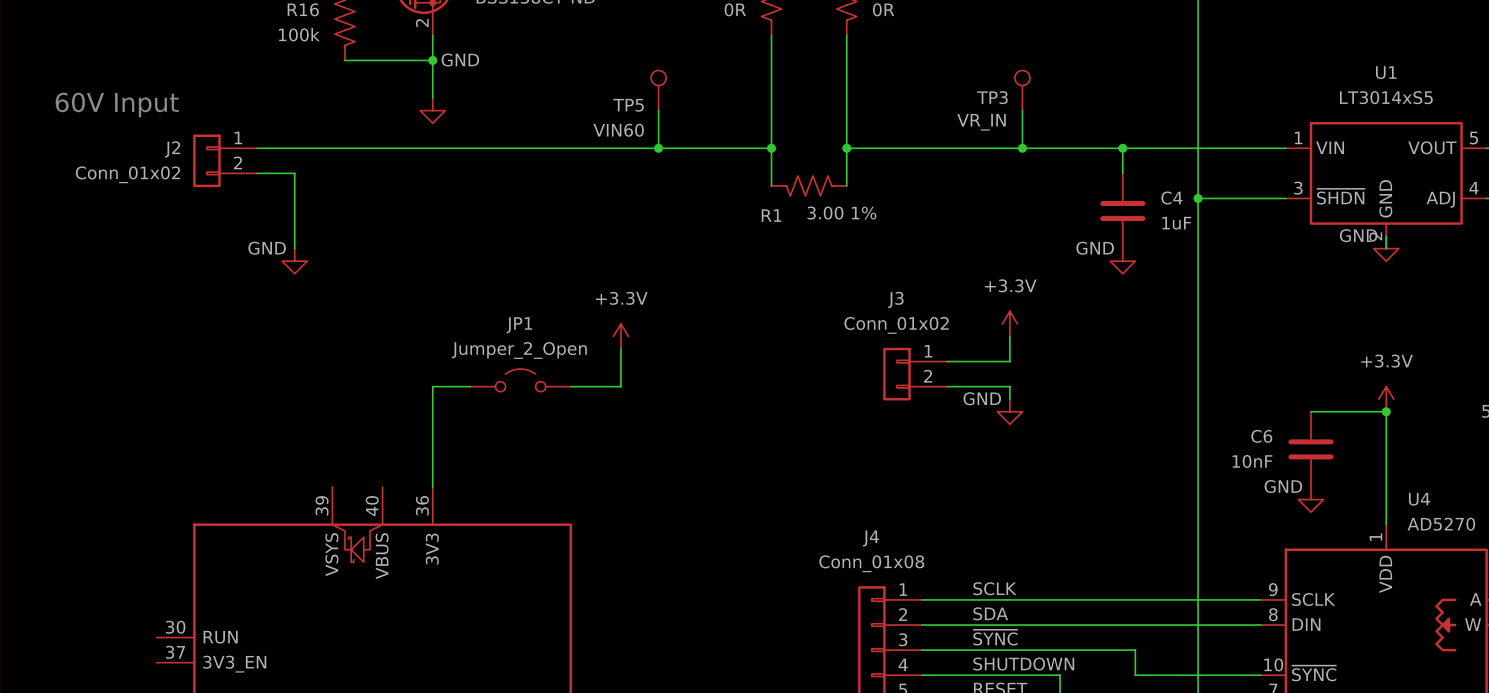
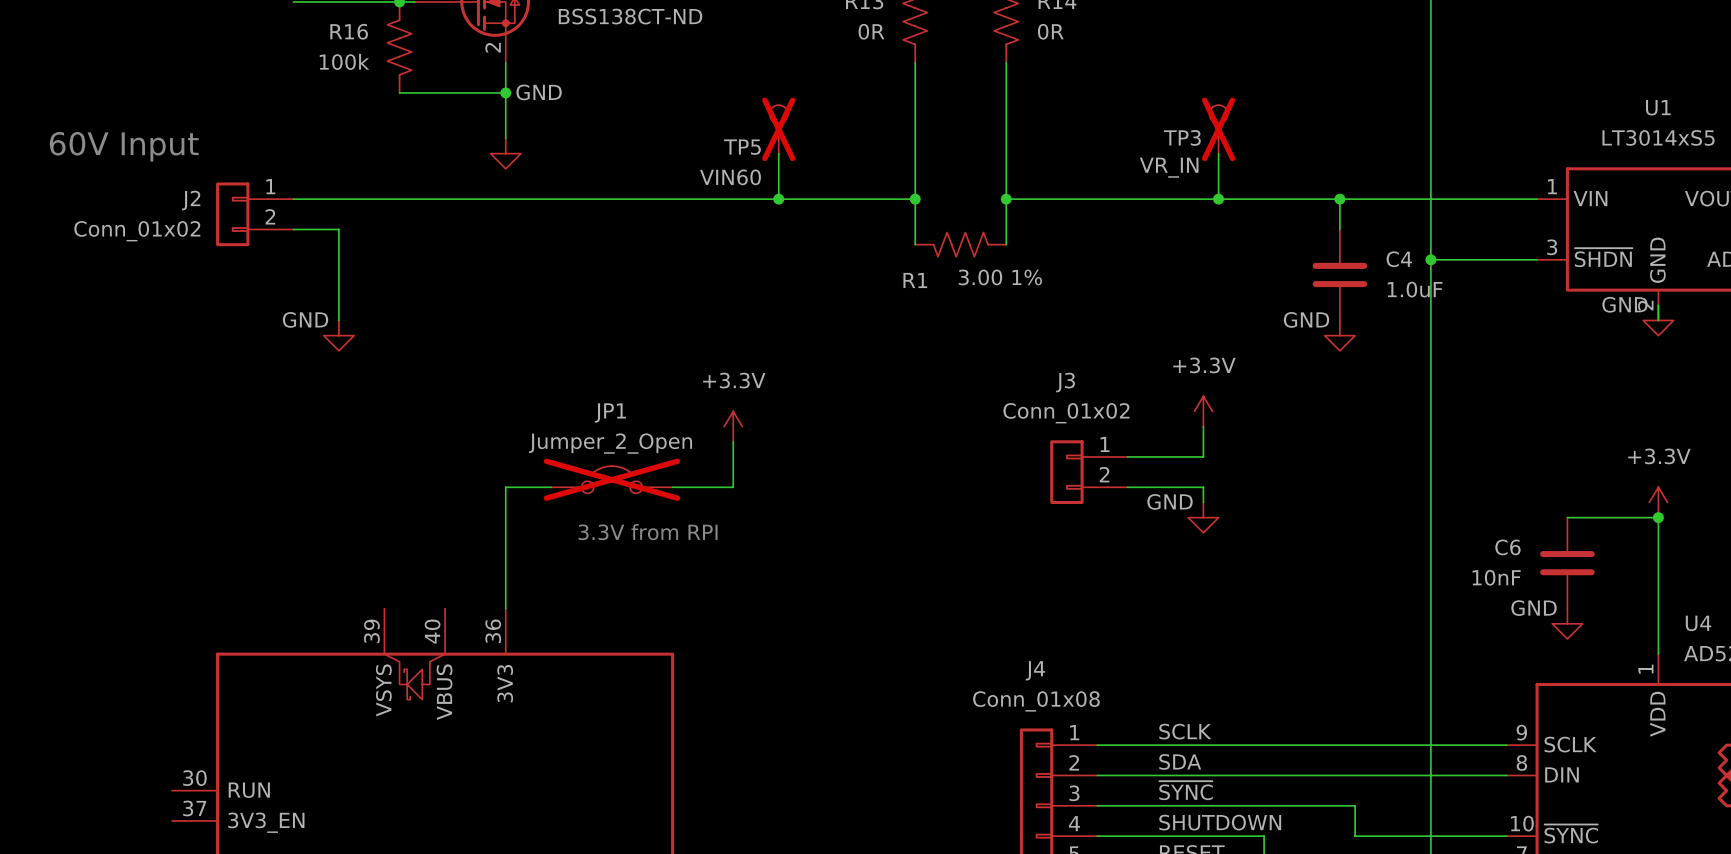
TP5 do-not-place cross: none -> (778, 129)
TP3 do-not-place cross: none -> (1218, 129)
C4 value: 1uF (1176, 223) -> 1.0uF (1415, 289)
JP1 do-not-place cross: none -> (611, 479)
text: none -> 3.3V from RPI (648, 532)

